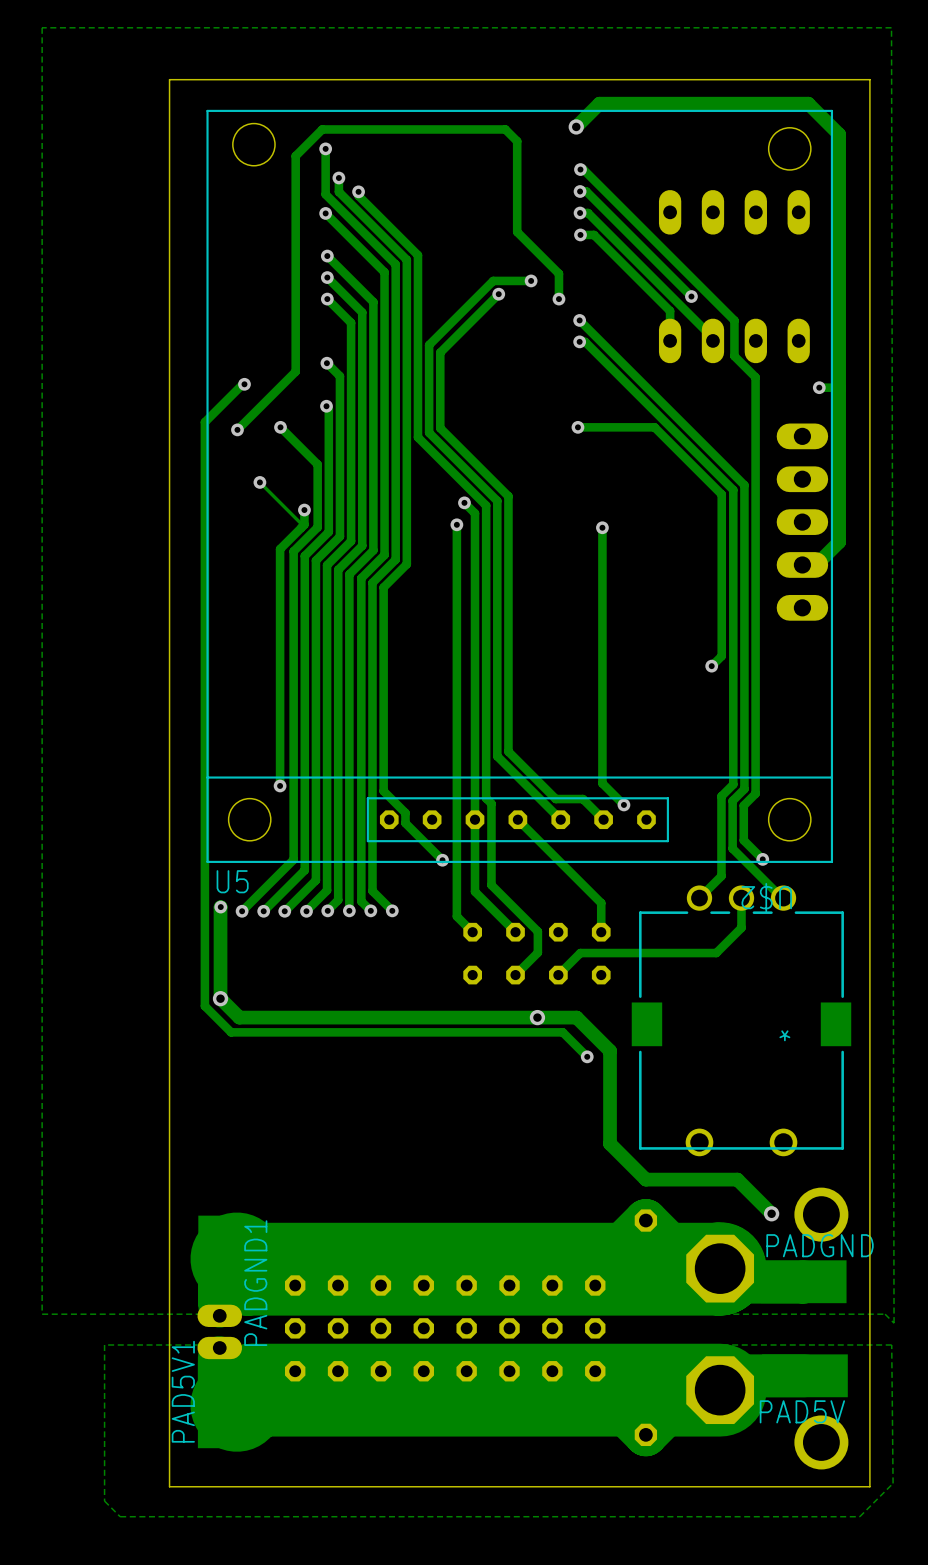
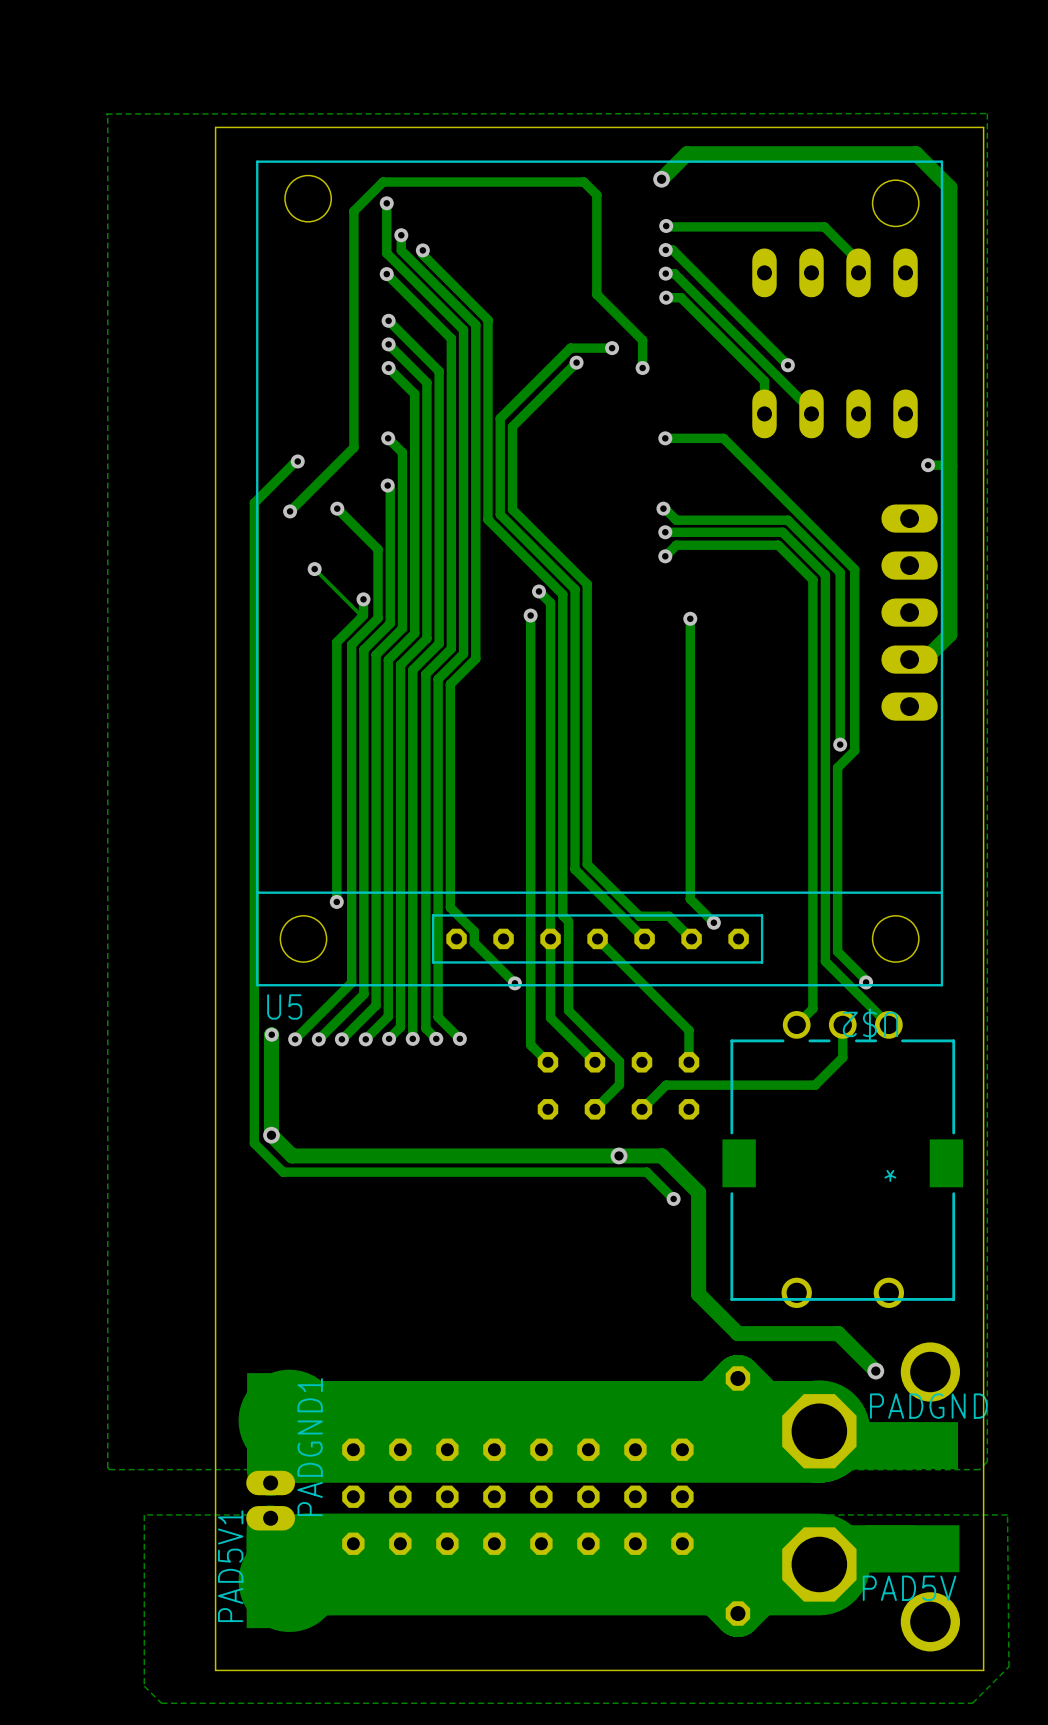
zone outline: (891, 27) (42, 27) (42, 1314) (885, 1314) (894, 1323) (891, 27) -> (987, 113) (987, 1461) (979, 1469) (109, 1469) (107, 1467) (106, 114) (987, 113)
track: (580, 169) (583, 169) (734, 320) (734, 356) (755, 377) (755, 793) (743, 805) (743, 840) (762, 859) -> none
track: none -> (664, 226) (824, 226) (858, 260) (858, 272)
track: (579, 320) (744, 485) (744, 789) (732, 800) (732, 848) (782, 898) -> none
via: (579, 320) -> none
track: (579, 341) (585, 341) (733, 490) (733, 784) (721, 796) (721, 876) (714, 883) -> (665, 556) (676, 545) (778, 545) (812, 579) (812, 1008)
via: (579, 341) -> none
track: none -> (665, 438) (723, 438) (854, 569) (854, 750) (837, 767) (837, 951) (866, 980)
via: none -> (665, 438)
track: (577, 427) (654, 427) (721, 494) (721, 656) (711, 666) -> none
track: none -> (665, 509) (676, 520) (787, 520) (840, 572) (840, 744)
track: none -> (665, 532) (782, 532) (825, 574) (825, 961) (888, 1024)
via: none -> (665, 532)
via: none -> (665, 556)
via position: (711, 666) -> (840, 744)

